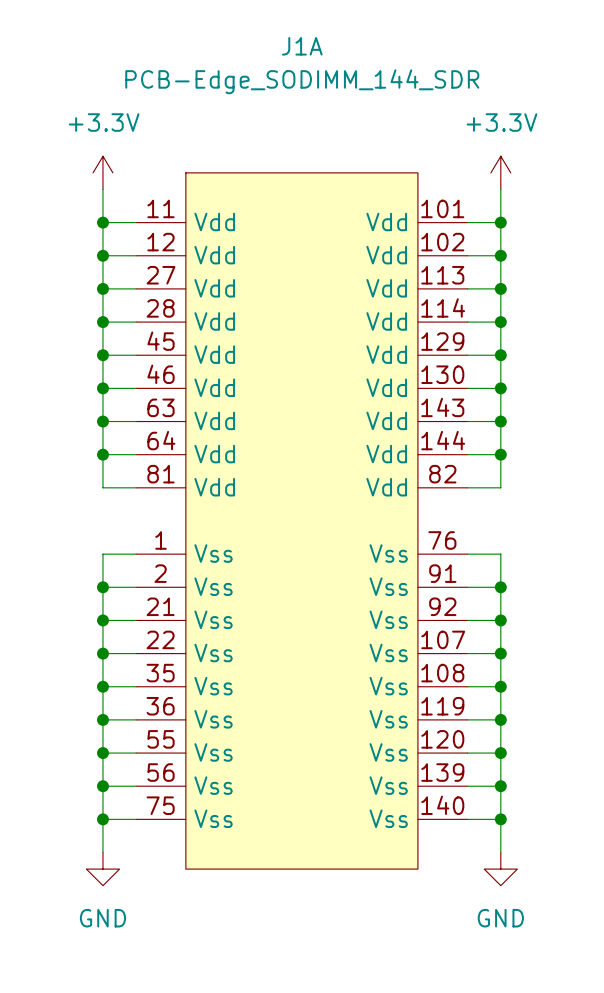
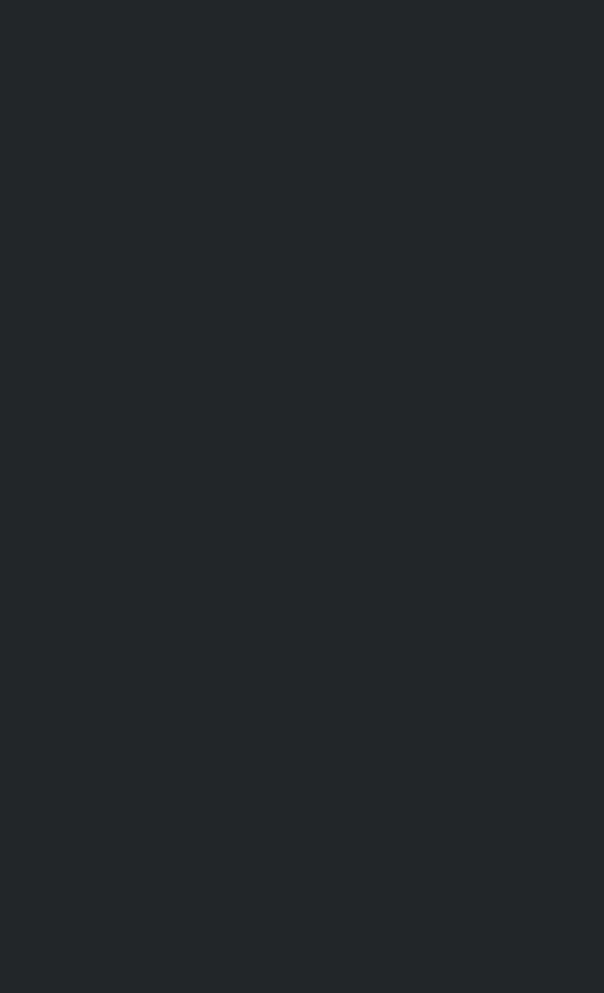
power symbol: +3.3V (102, 172) -> none
power symbol: +3.3V (500, 172) -> none
wire: (102, 189) (102, 487) (136, 487) -> none
wire: (500, 189) (500, 487) (467, 487) -> none
wire: (102, 222) (136, 222) -> none
junction: (102, 222) -> none
wire: (467, 222) (500, 222) -> none
junction: (500, 222) -> none
wire: (102, 255) (136, 255) -> none
junction: (102, 255) -> none
wire: (467, 255) (500, 255) -> none
junction: (500, 255) -> none
wire: (102, 288) (136, 288) -> none
junction: (102, 288) -> none
wire: (467, 288) (500, 288) -> none
junction: (500, 288) -> none
wire: (102, 322) (136, 322) -> none
junction: (102, 322) -> none
wire: (467, 322) (500, 322) -> none
junction: (500, 322) -> none
wire: (102, 355) (136, 355) -> none
junction: (102, 355) -> none
wire: (467, 355) (500, 355) -> none
junction: (500, 355) -> none
wire: (102, 388) (136, 388) -> none
junction: (102, 388) -> none
wire: (467, 388) (500, 388) -> none
junction: (500, 388) -> none
wire: (102, 421) (136, 421) -> none
junction: (102, 421) -> none
wire: (467, 421) (500, 421) -> none
junction: (500, 421) -> none
wire: (102, 454) (136, 454) -> none
junction: (102, 454) -> none
wire: (467, 454) (500, 454) -> none
junction: (500, 454) -> none
J1A: PCB-Edge_SODIMM_144_SDR (301, 520) -> none
wire: (136, 554) (102, 554) (102, 852) -> none
wire: (467, 554) (500, 554) (500, 852) -> none
wire: (102, 587) (136, 587) -> none
junction: (102, 587) -> none
wire: (467, 587) (500, 587) -> none
junction: (500, 587) -> none
wire: (102, 620) (136, 620) -> none
junction: (102, 620) -> none
wire: (467, 620) (500, 620) -> none
junction: (500, 620) -> none
wire: (102, 653) (136, 653) -> none
junction: (102, 653) -> none
wire: (467, 653) (500, 653) -> none
junction: (500, 653) -> none
wire: (102, 686) (136, 686) -> none
junction: (102, 686) -> none
wire: (467, 686) (500, 686) -> none
junction: (500, 686) -> none
wire: (102, 719) (136, 719) -> none
junction: (102, 719) -> none
wire: (467, 719) (500, 719) -> none
junction: (500, 719) -> none
wire: (102, 753) (136, 753) -> none
junction: (102, 753) -> none
wire: (467, 753) (500, 753) -> none
junction: (500, 753) -> none
wire: (102, 786) (136, 786) -> none
junction: (102, 786) -> none
wire: (467, 786) (500, 786) -> none
junction: (500, 786) -> none
wire: (102, 819) (136, 819) -> none
junction: (102, 819) -> none
wire: (467, 819) (500, 819) -> none
junction: (500, 819) -> none
power symbol: GND (102, 869) -> none
power symbol: GND (500, 869) -> none

